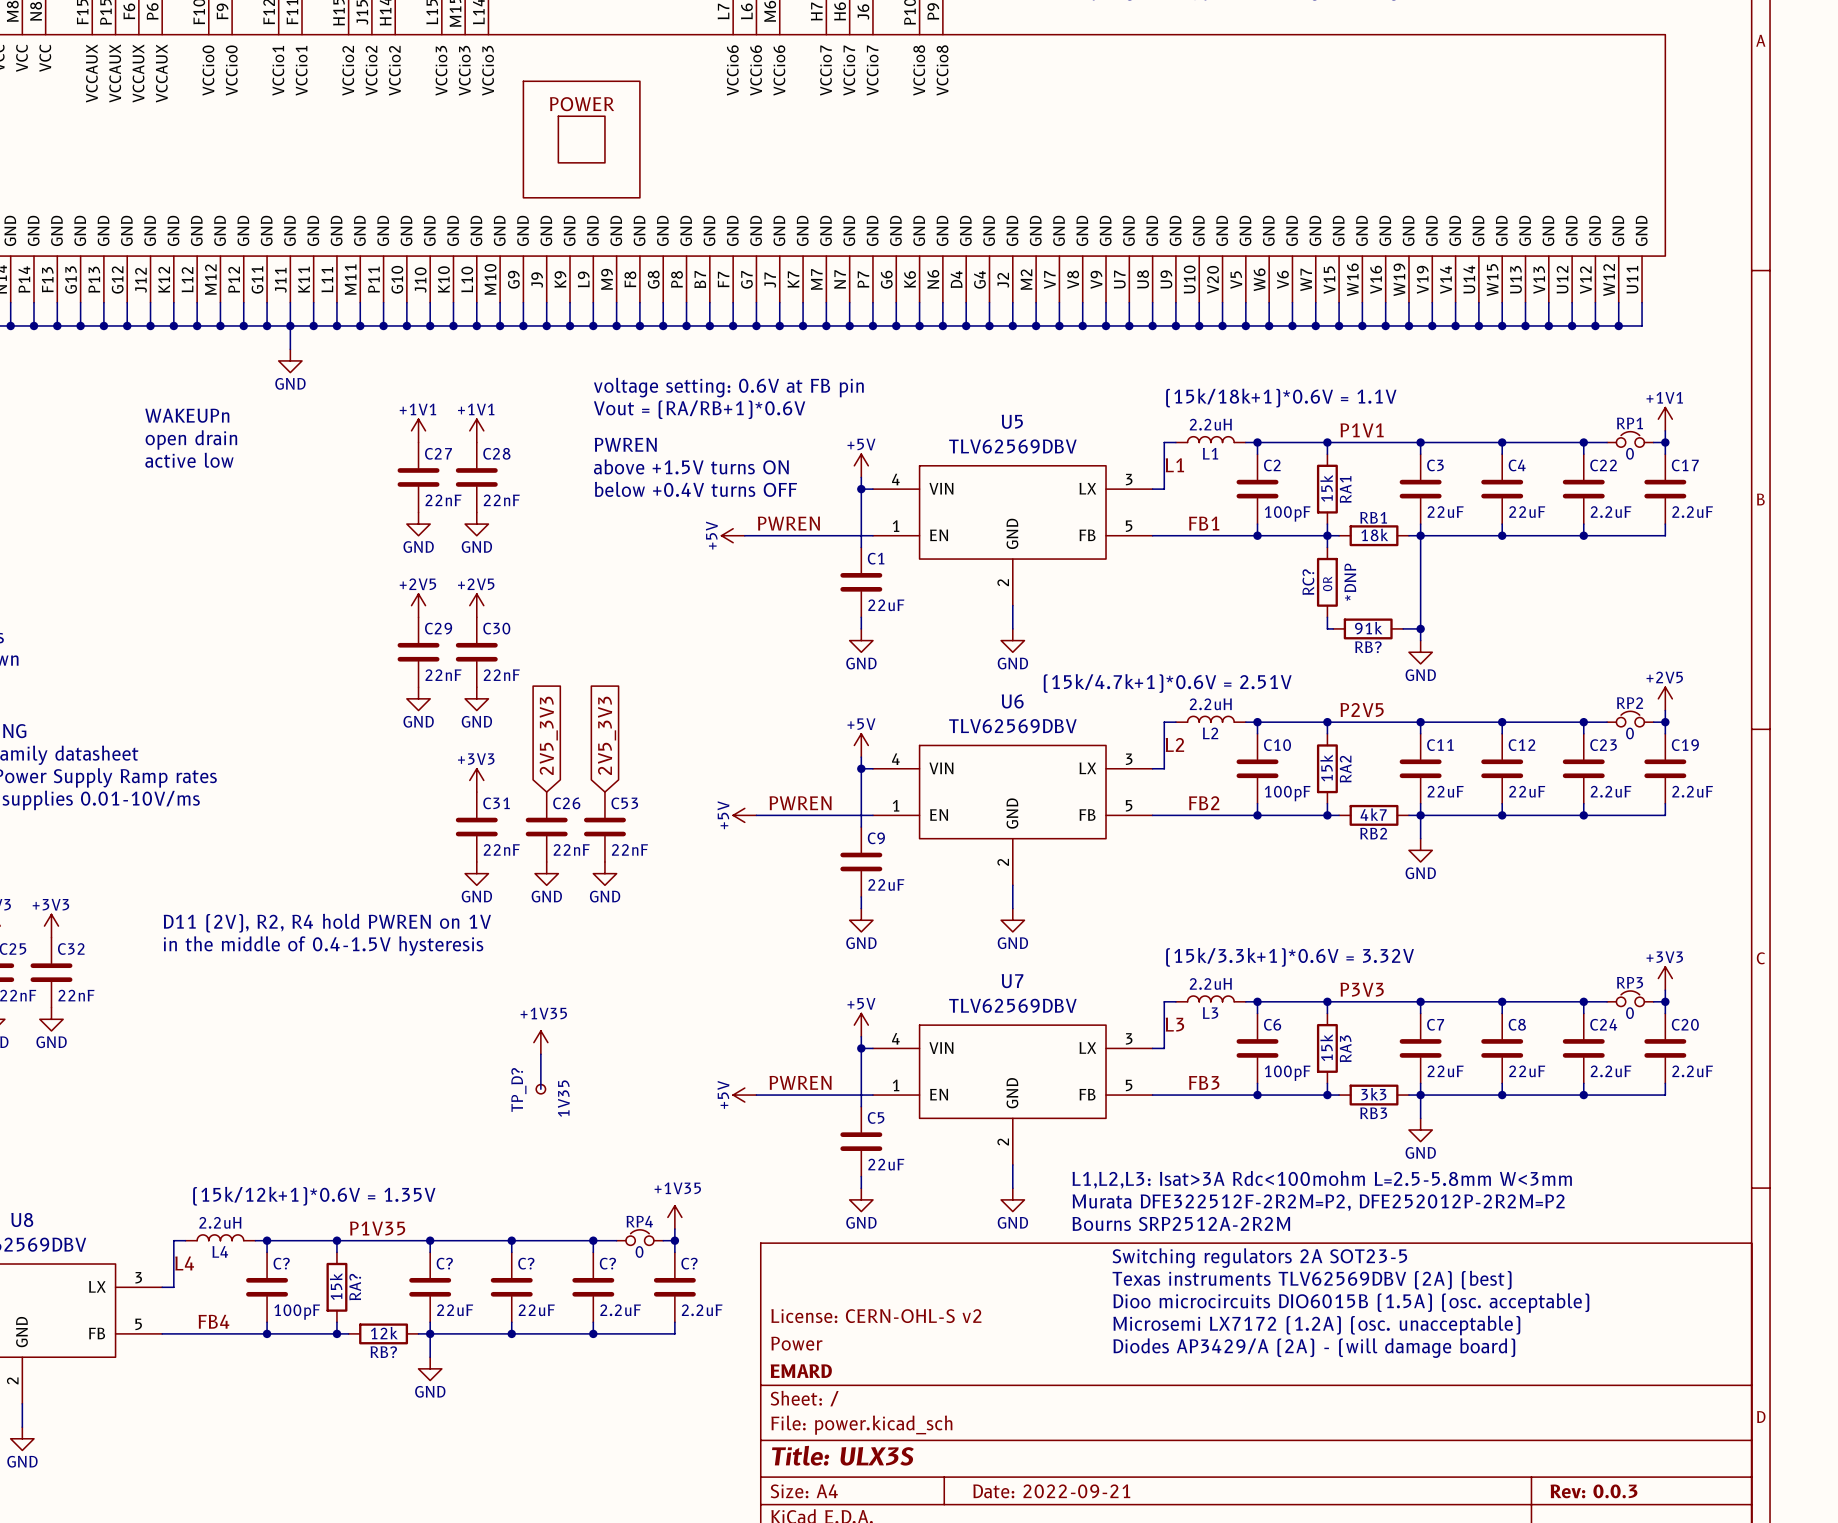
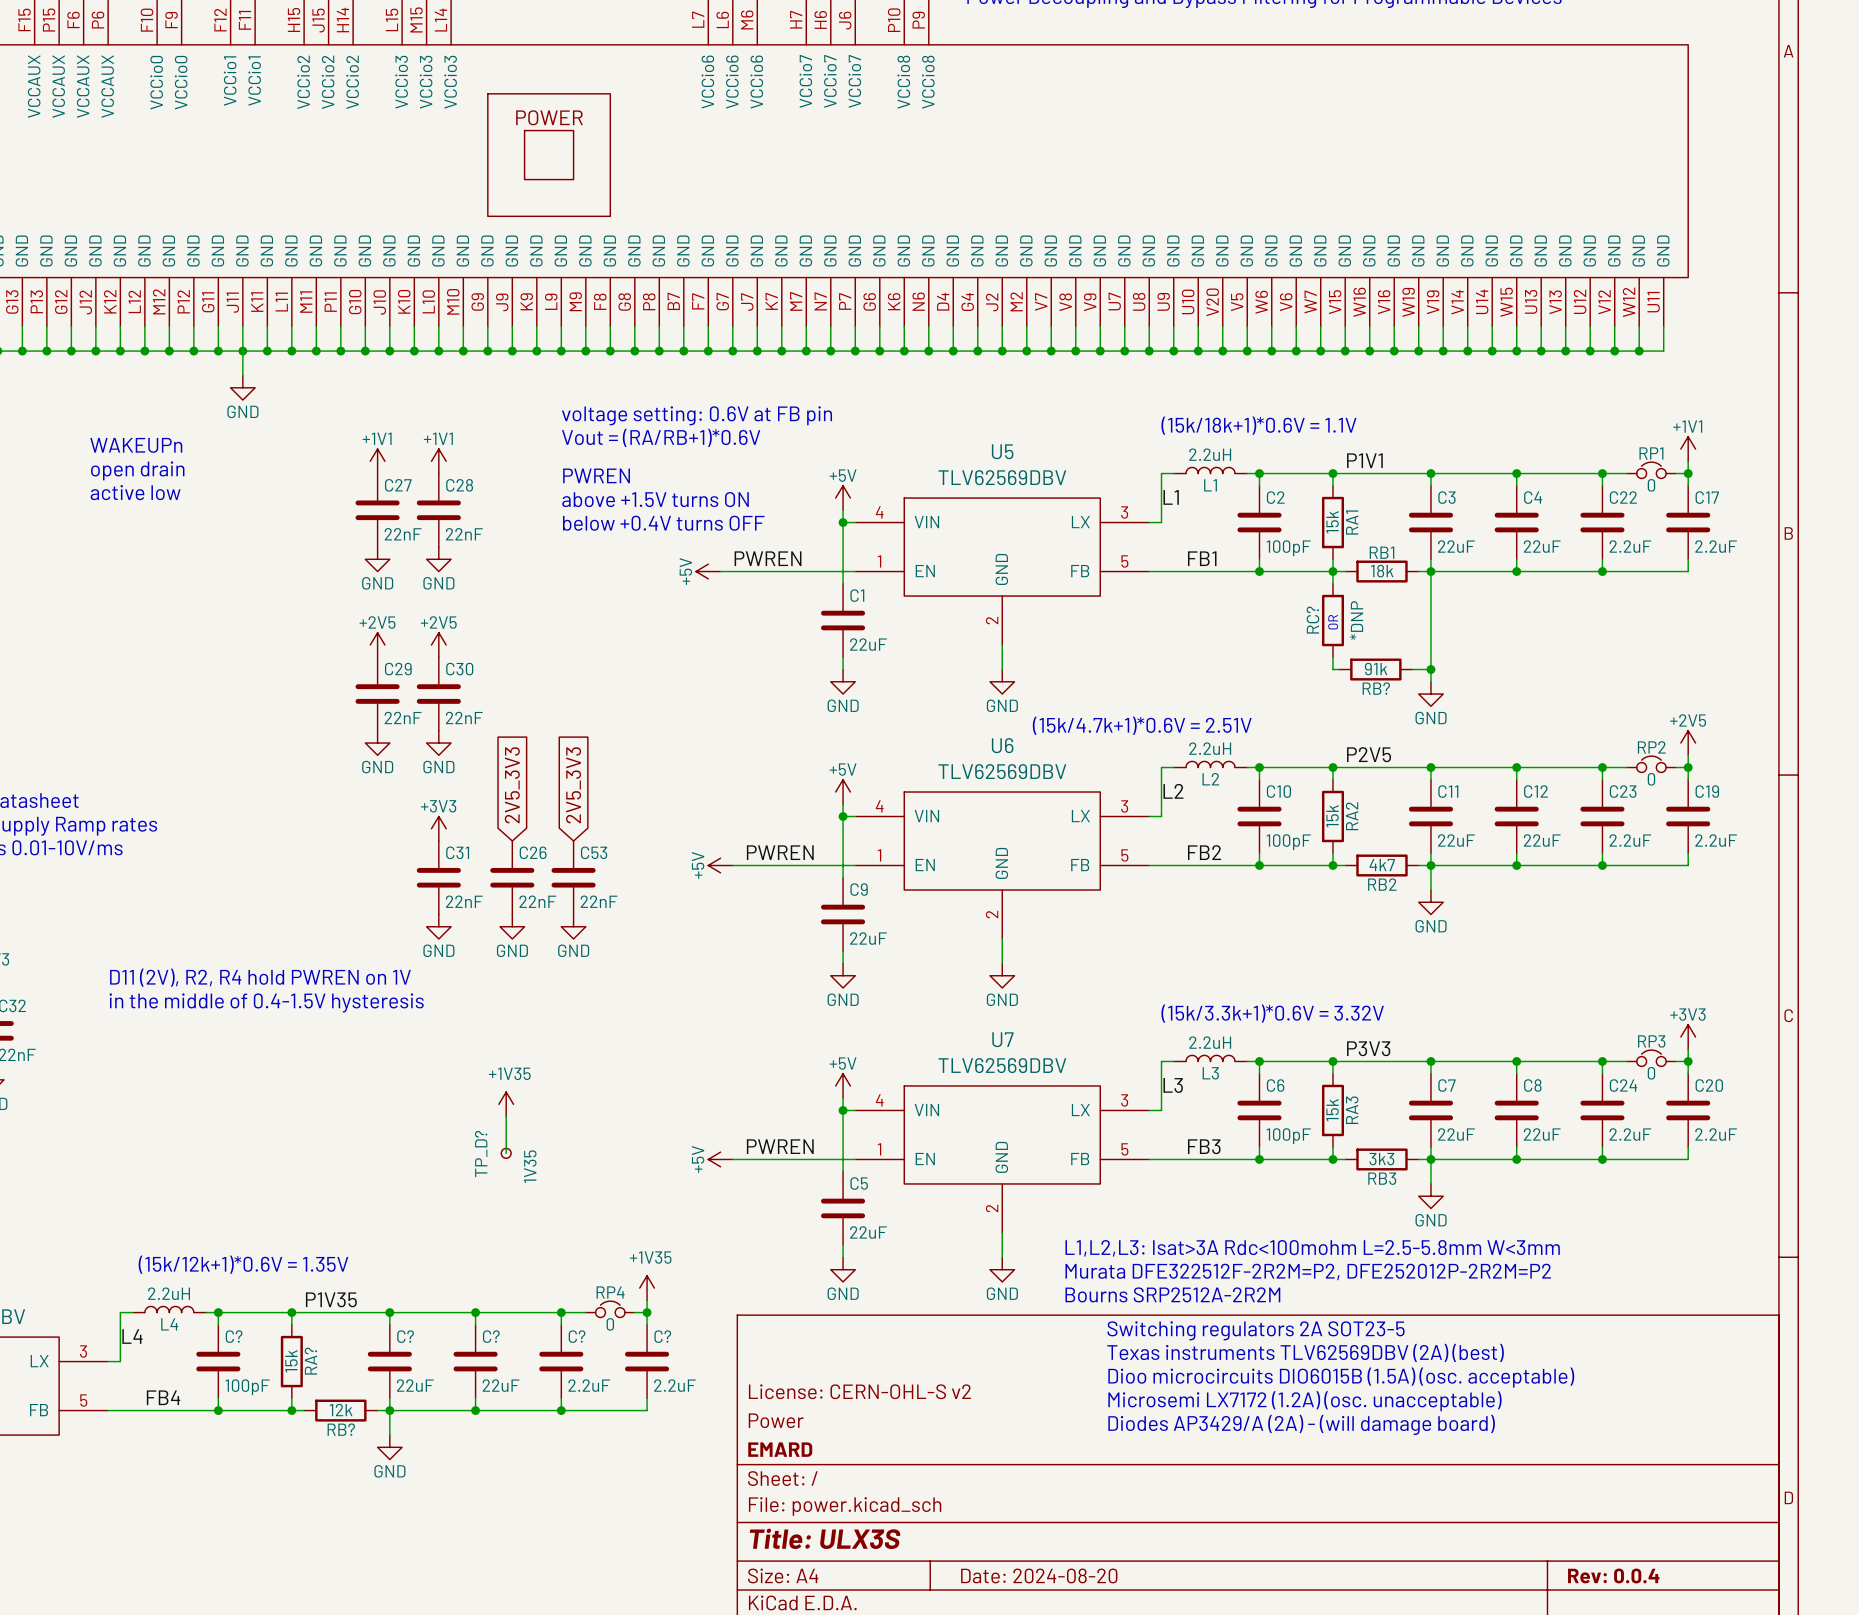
title block: Date: 2022-09-21 (1051, 1491) -> Date: 2024-08-20 (1039, 1575)
title block: Rev: 0.0.3 (1593, 1491) -> Rev: 0.0.4 (1613, 1575)

